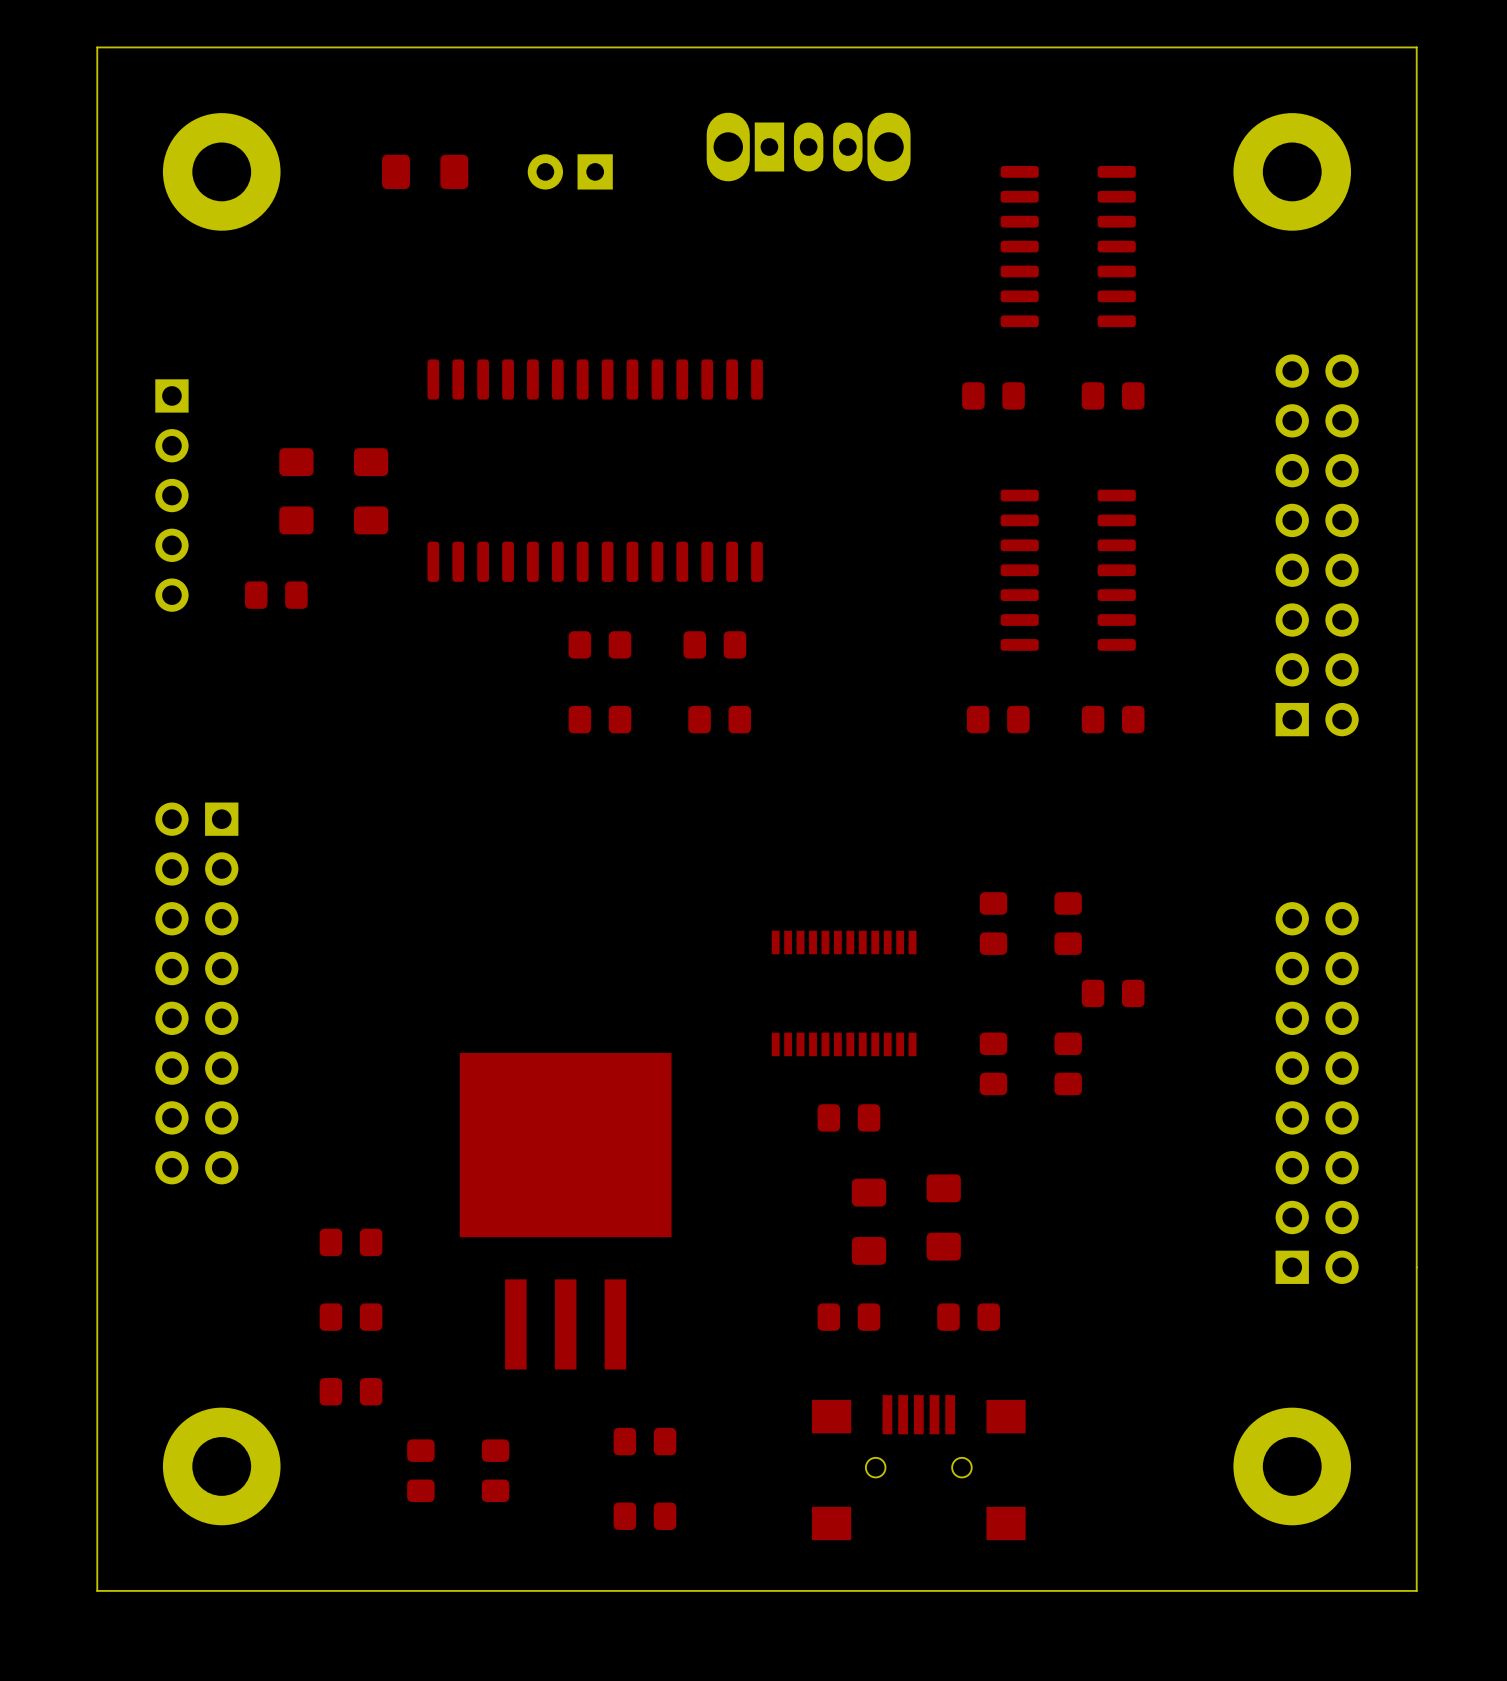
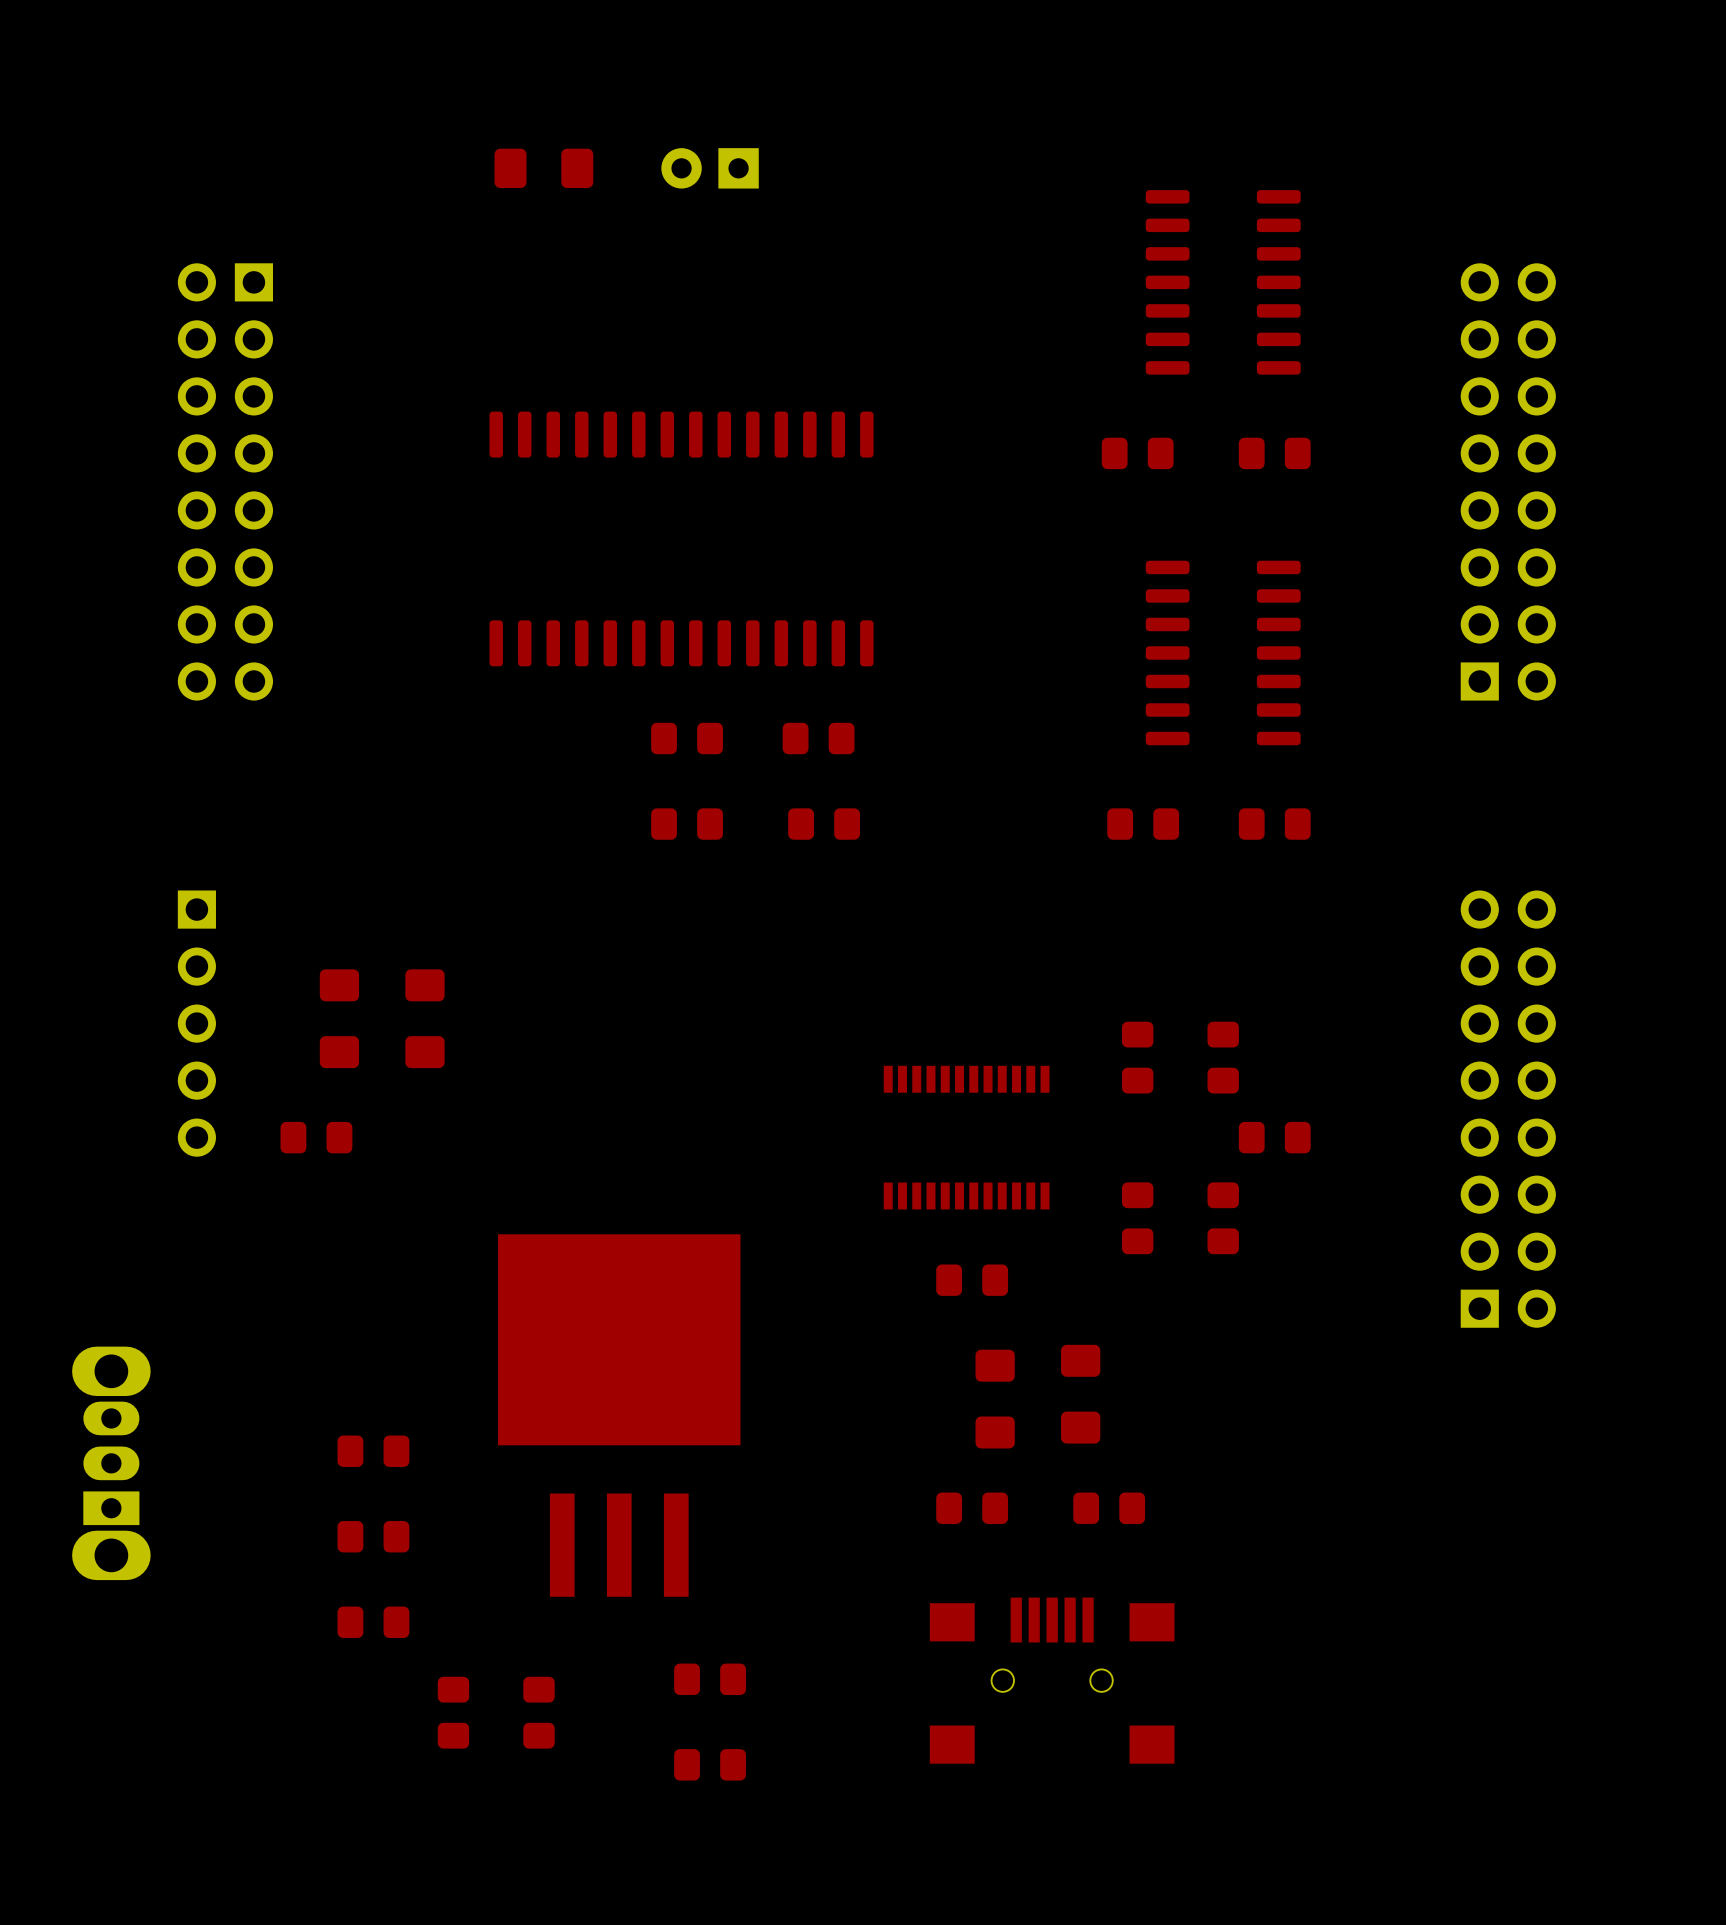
board edge: (1416, 47) (1416, 1590) (97, 1590) (97, 47) (1416, 47) -> none
part: (808, 147) -> none
part: (221, 171) -> none
part position: (425, 171) -> (543, 168)
part position: (570, 171) -> (710, 168)
part: (1292, 171) -> none
part: none -> (225, 481)
part: (296, 491) -> none
part: (371, 491) -> none
part position: (171, 495) -> (196, 1023)
part position: (1317, 545) -> (1508, 481)
part: (276, 595) -> none
part: none -> (339, 1018)
part: none -> (424, 1018)
part: (196, 993) -> none
part: none -> (316, 1137)
part position: (1317, 1093) -> (1508, 1109)
part position: (565, 1211) -> (619, 1415)
part: (351, 1242) -> none
part: none -> (373, 1451)
part: none -> (111, 1463)
part: (351, 1317) -> none
part: none -> (373, 1536)
part: (351, 1391) -> none
part: none -> (373, 1622)
part: (644, 1441) -> none
part: (221, 1466) -> none
part: none -> (710, 1679)
part: (1292, 1466) -> none
part: (420, 1470) -> none
part: (495, 1470) -> none
part: none -> (453, 1712)
part: none -> (539, 1712)
part: (644, 1516) -> none
part: none -> (710, 1764)

